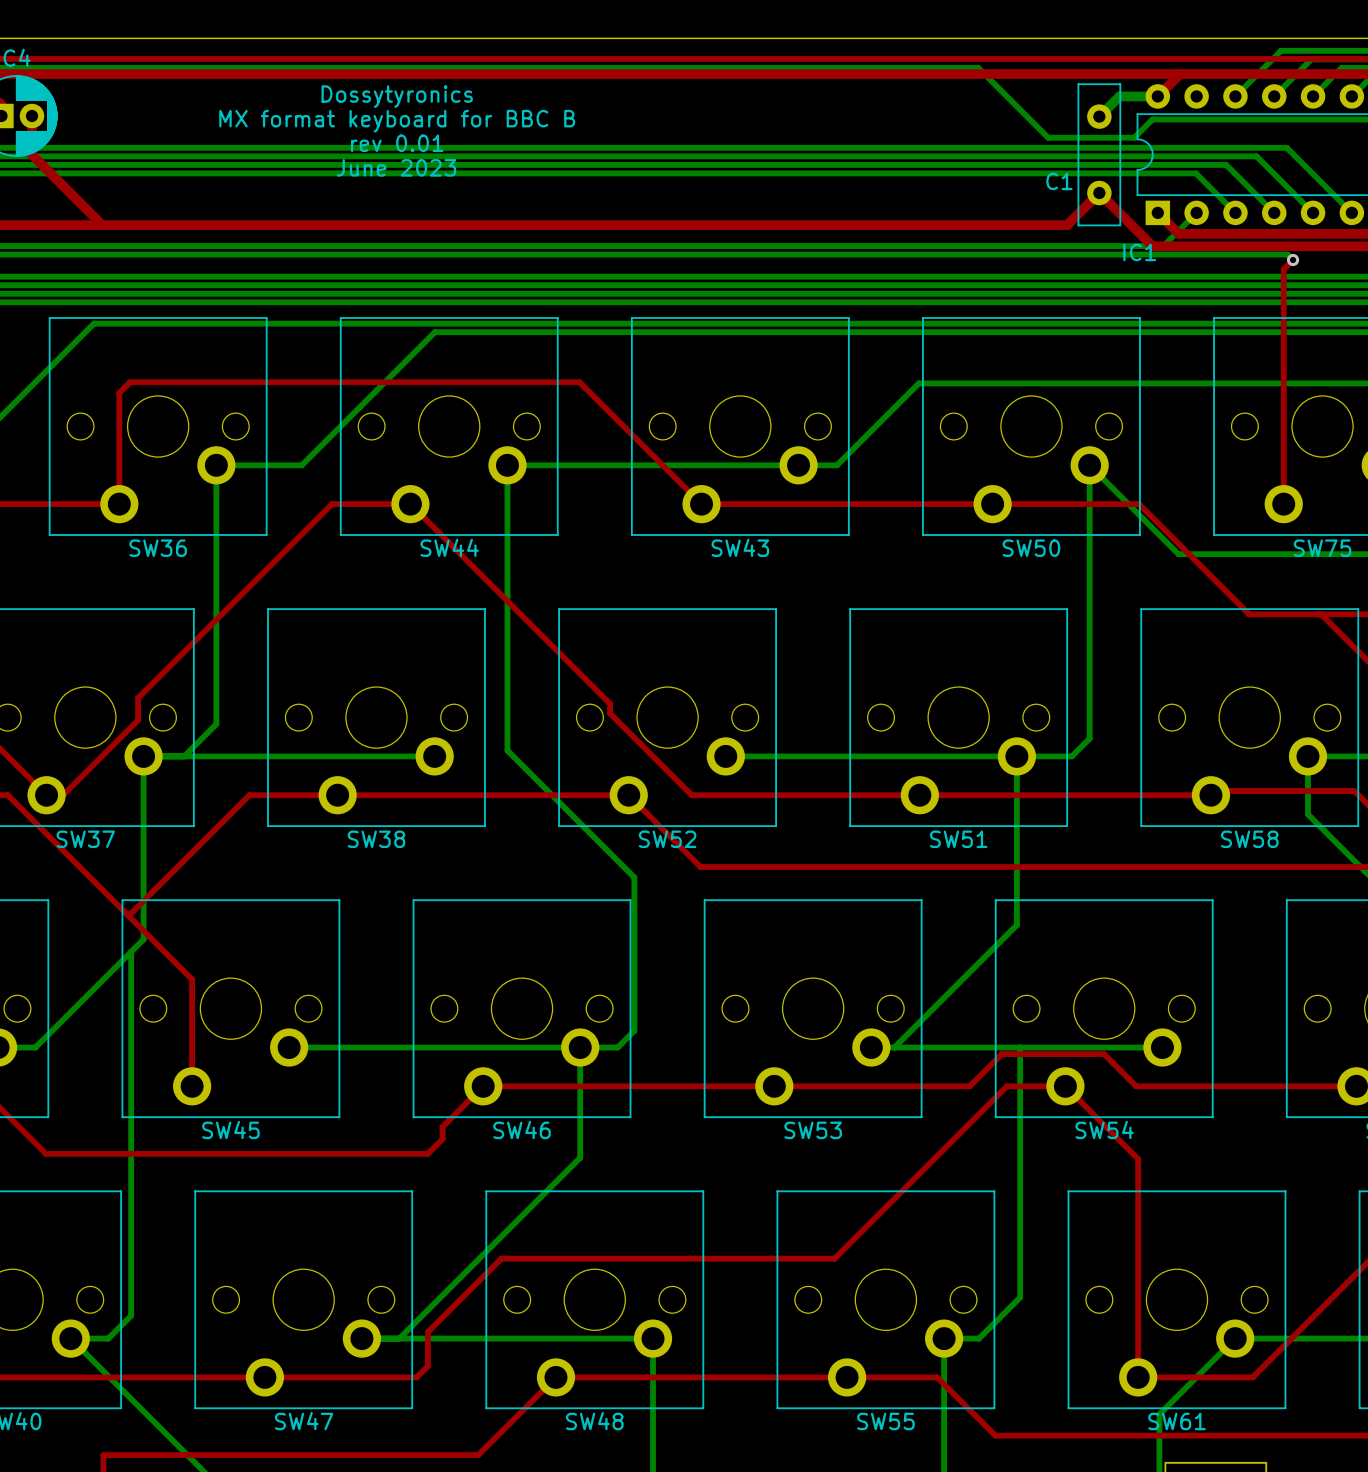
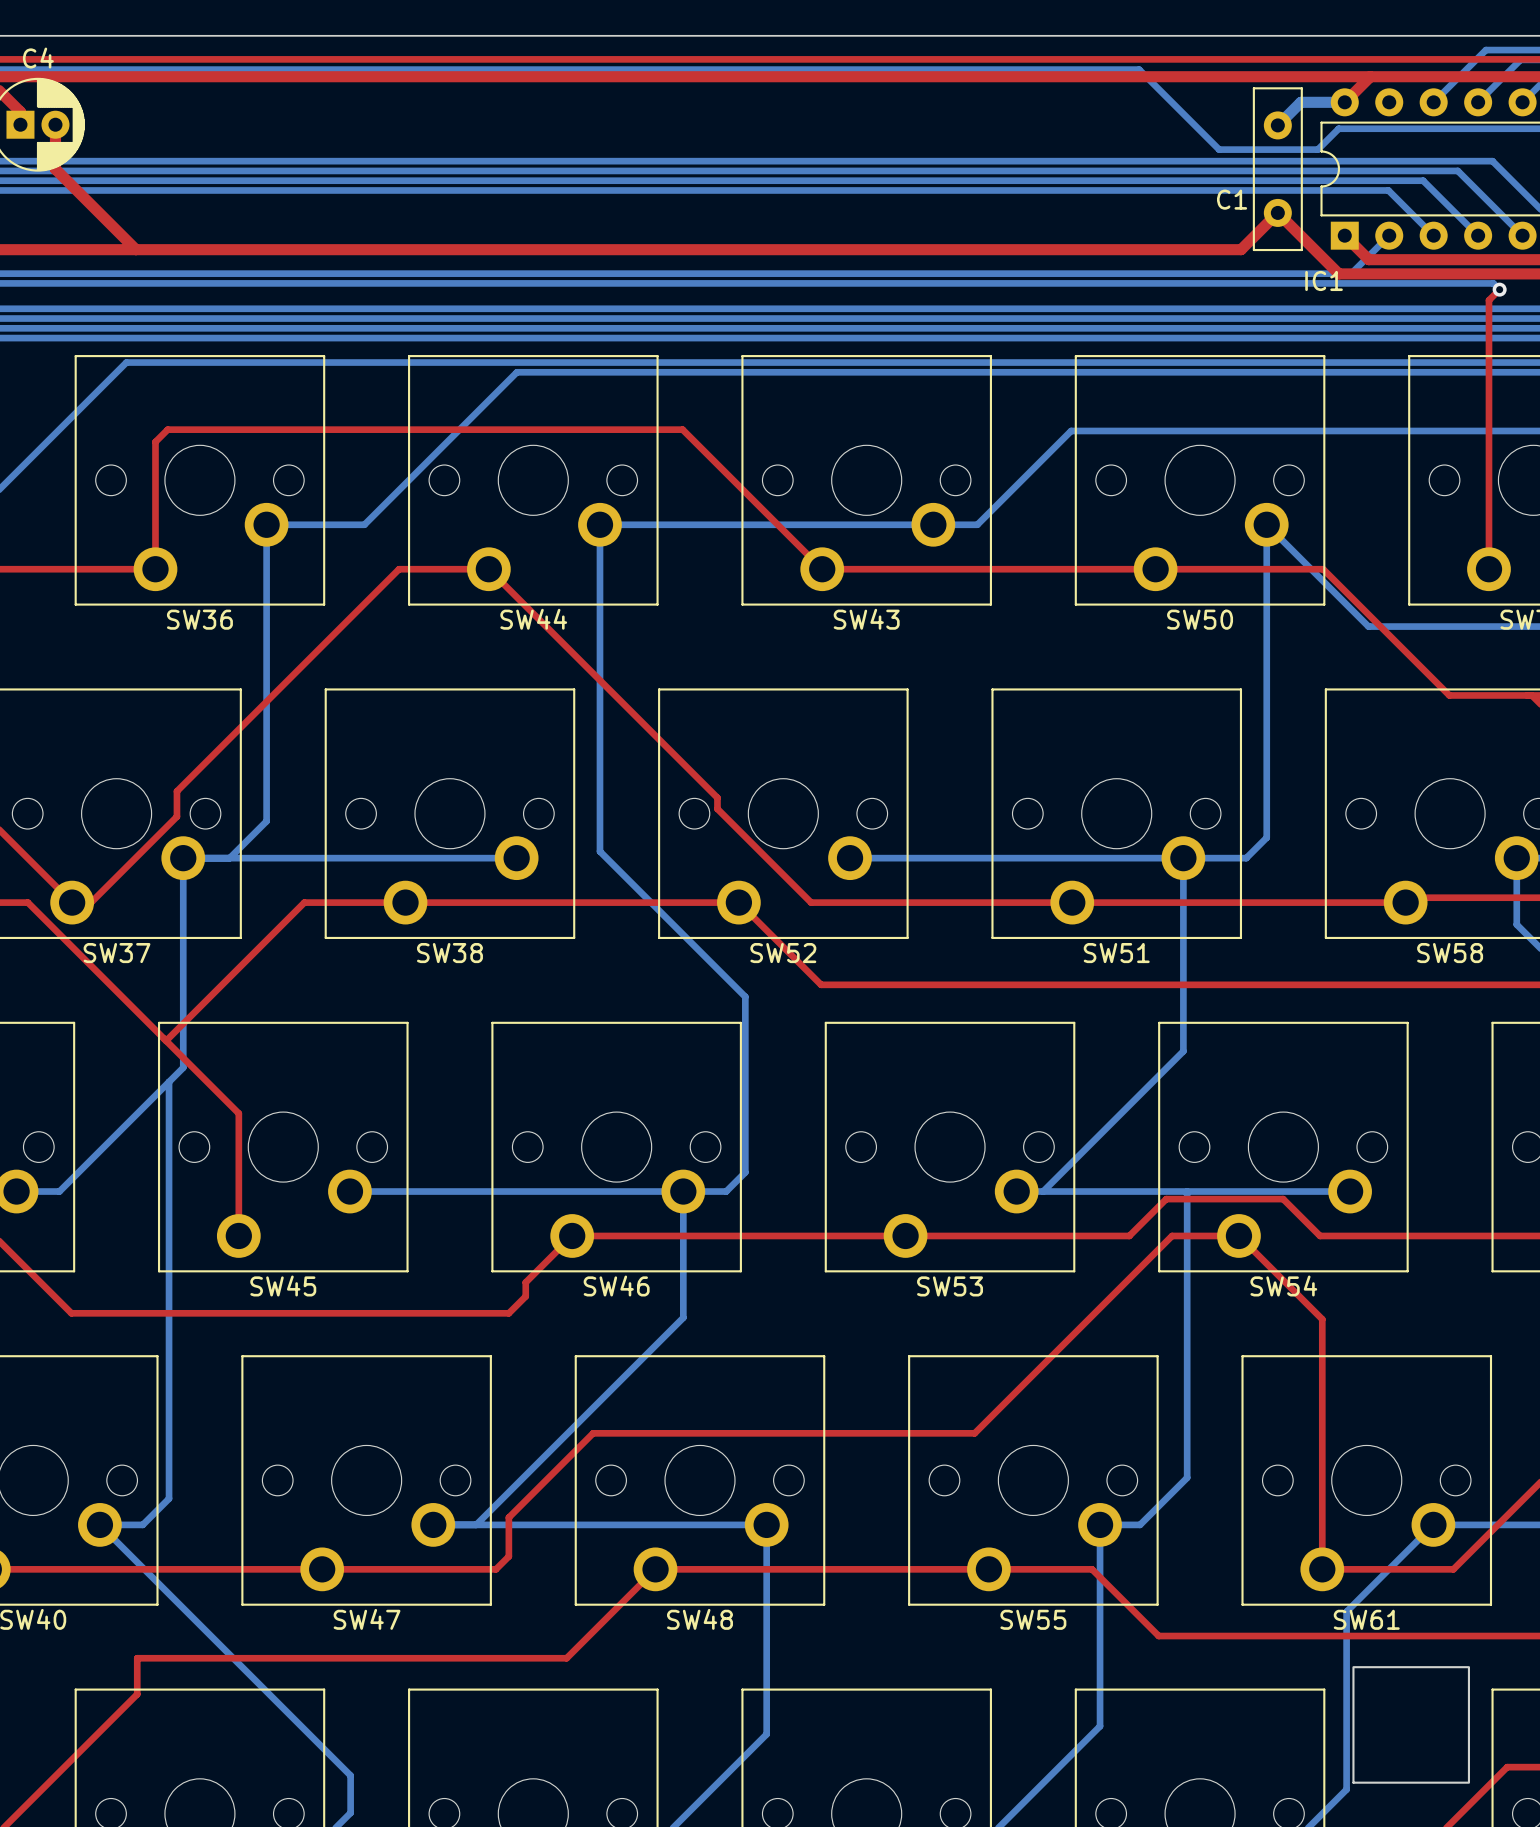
text: Dossytyronics (397, 96) -> none
text: MX format keyboard for BBC B (397, 121) -> none
text: rev 0.01 (397, 143) -> none
text: June 2023 (396, 167) -> none

